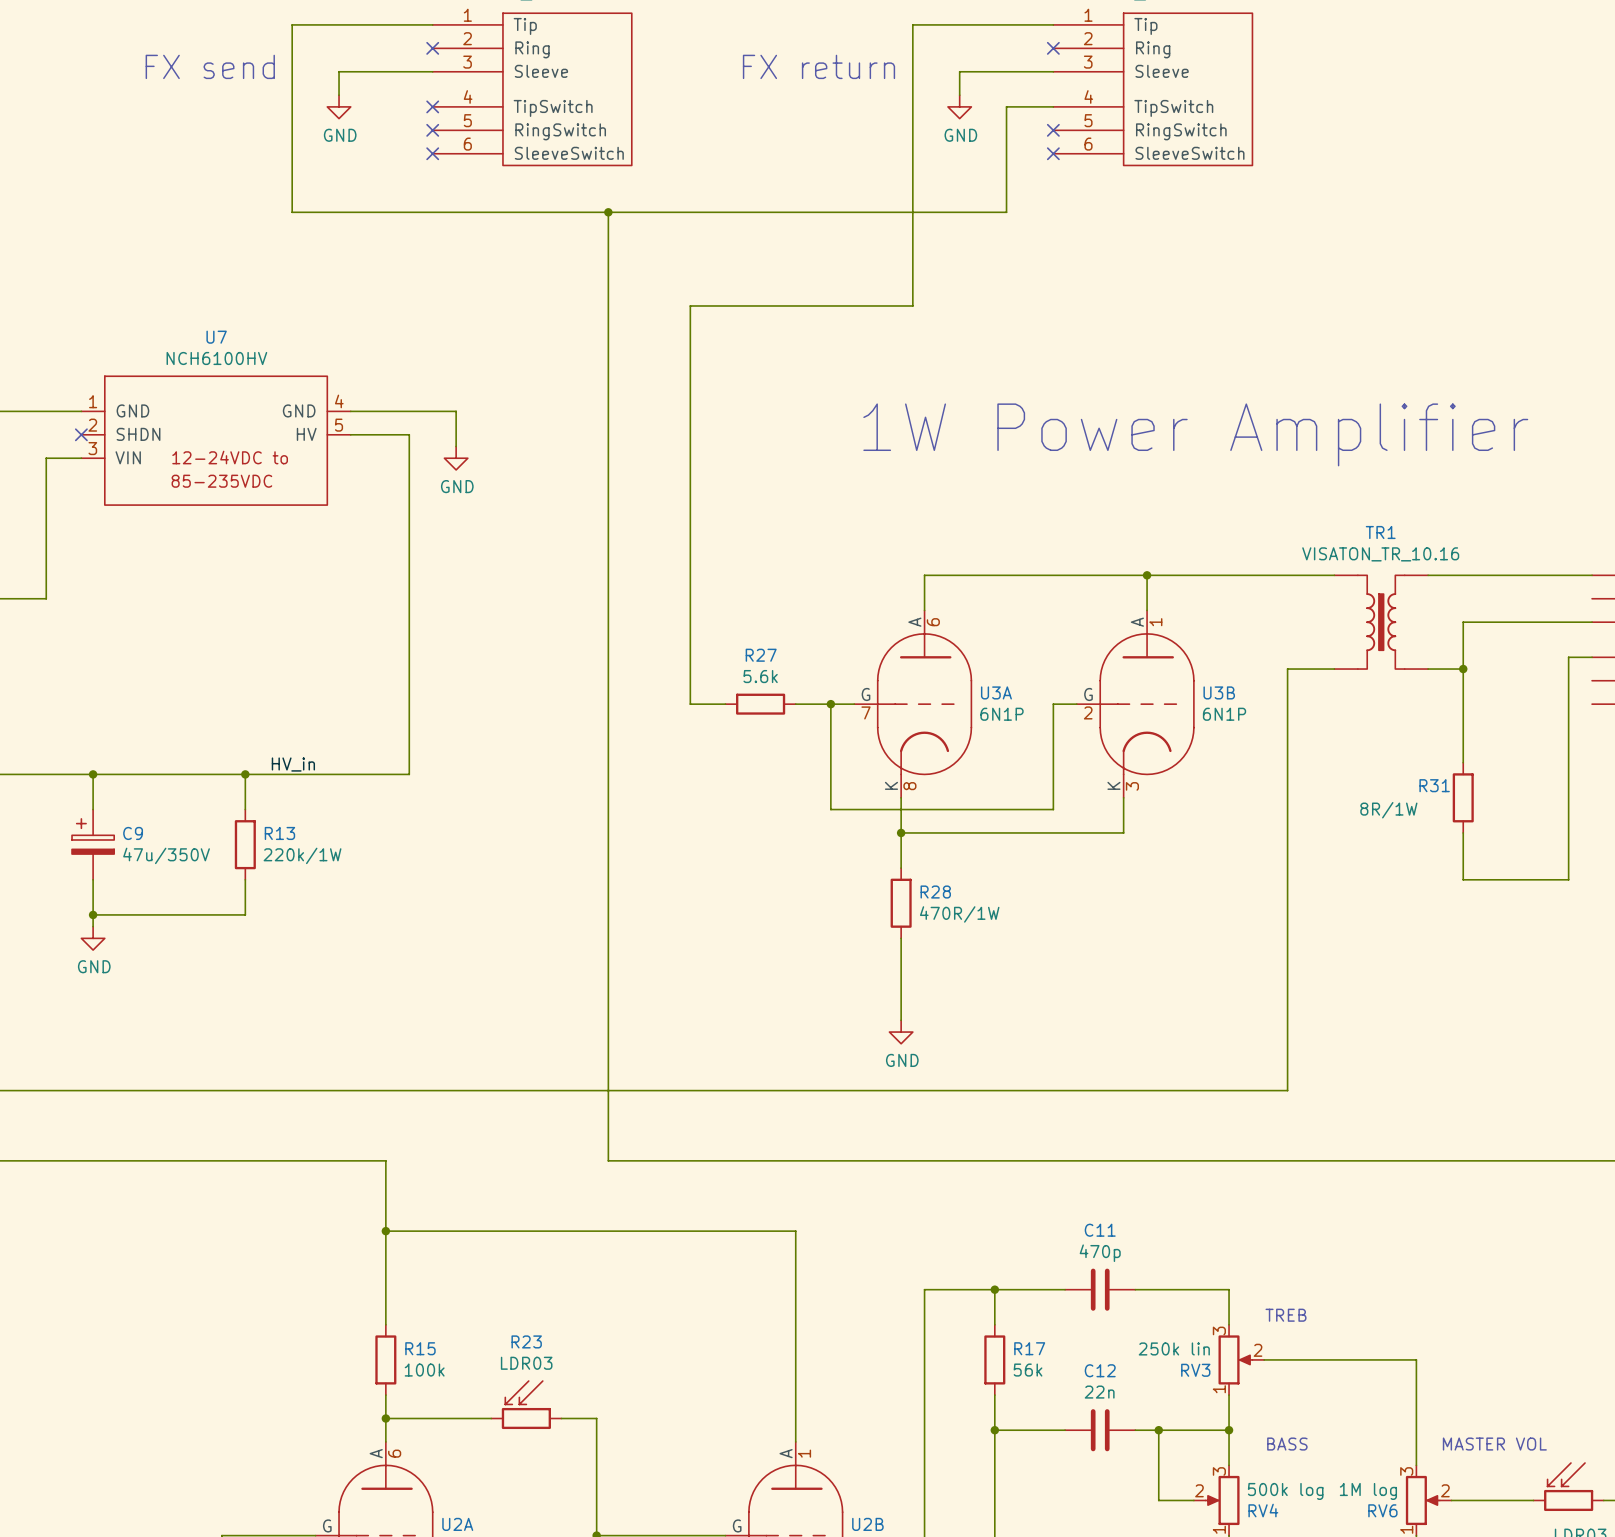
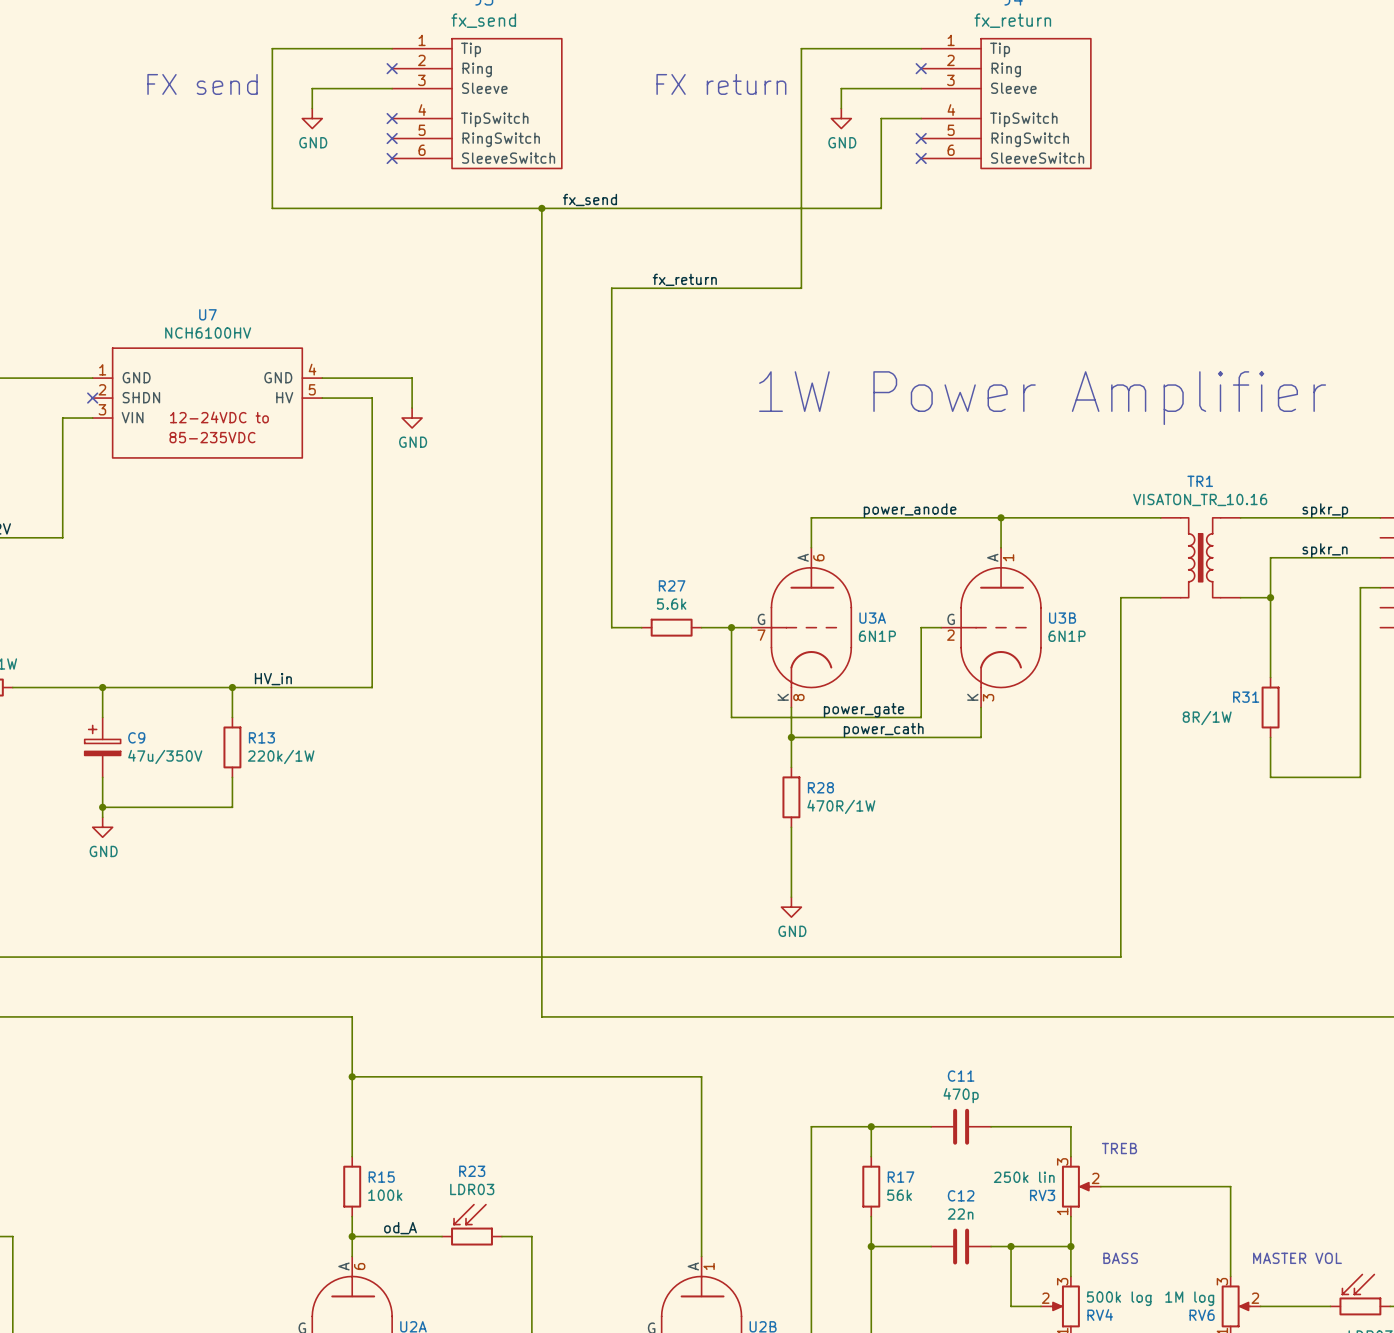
label: none -> fx_send (589, 199)
label: none -> fx_return (684, 279)
label: none -> power_anode (910, 510)
label: none -> spkr_p (1325, 510)
label: none -> spkr_n (1325, 550)
label: none -> power_gate (863, 710)
label: none -> power_cath (883, 730)
label: none -> od_A (400, 1228)

